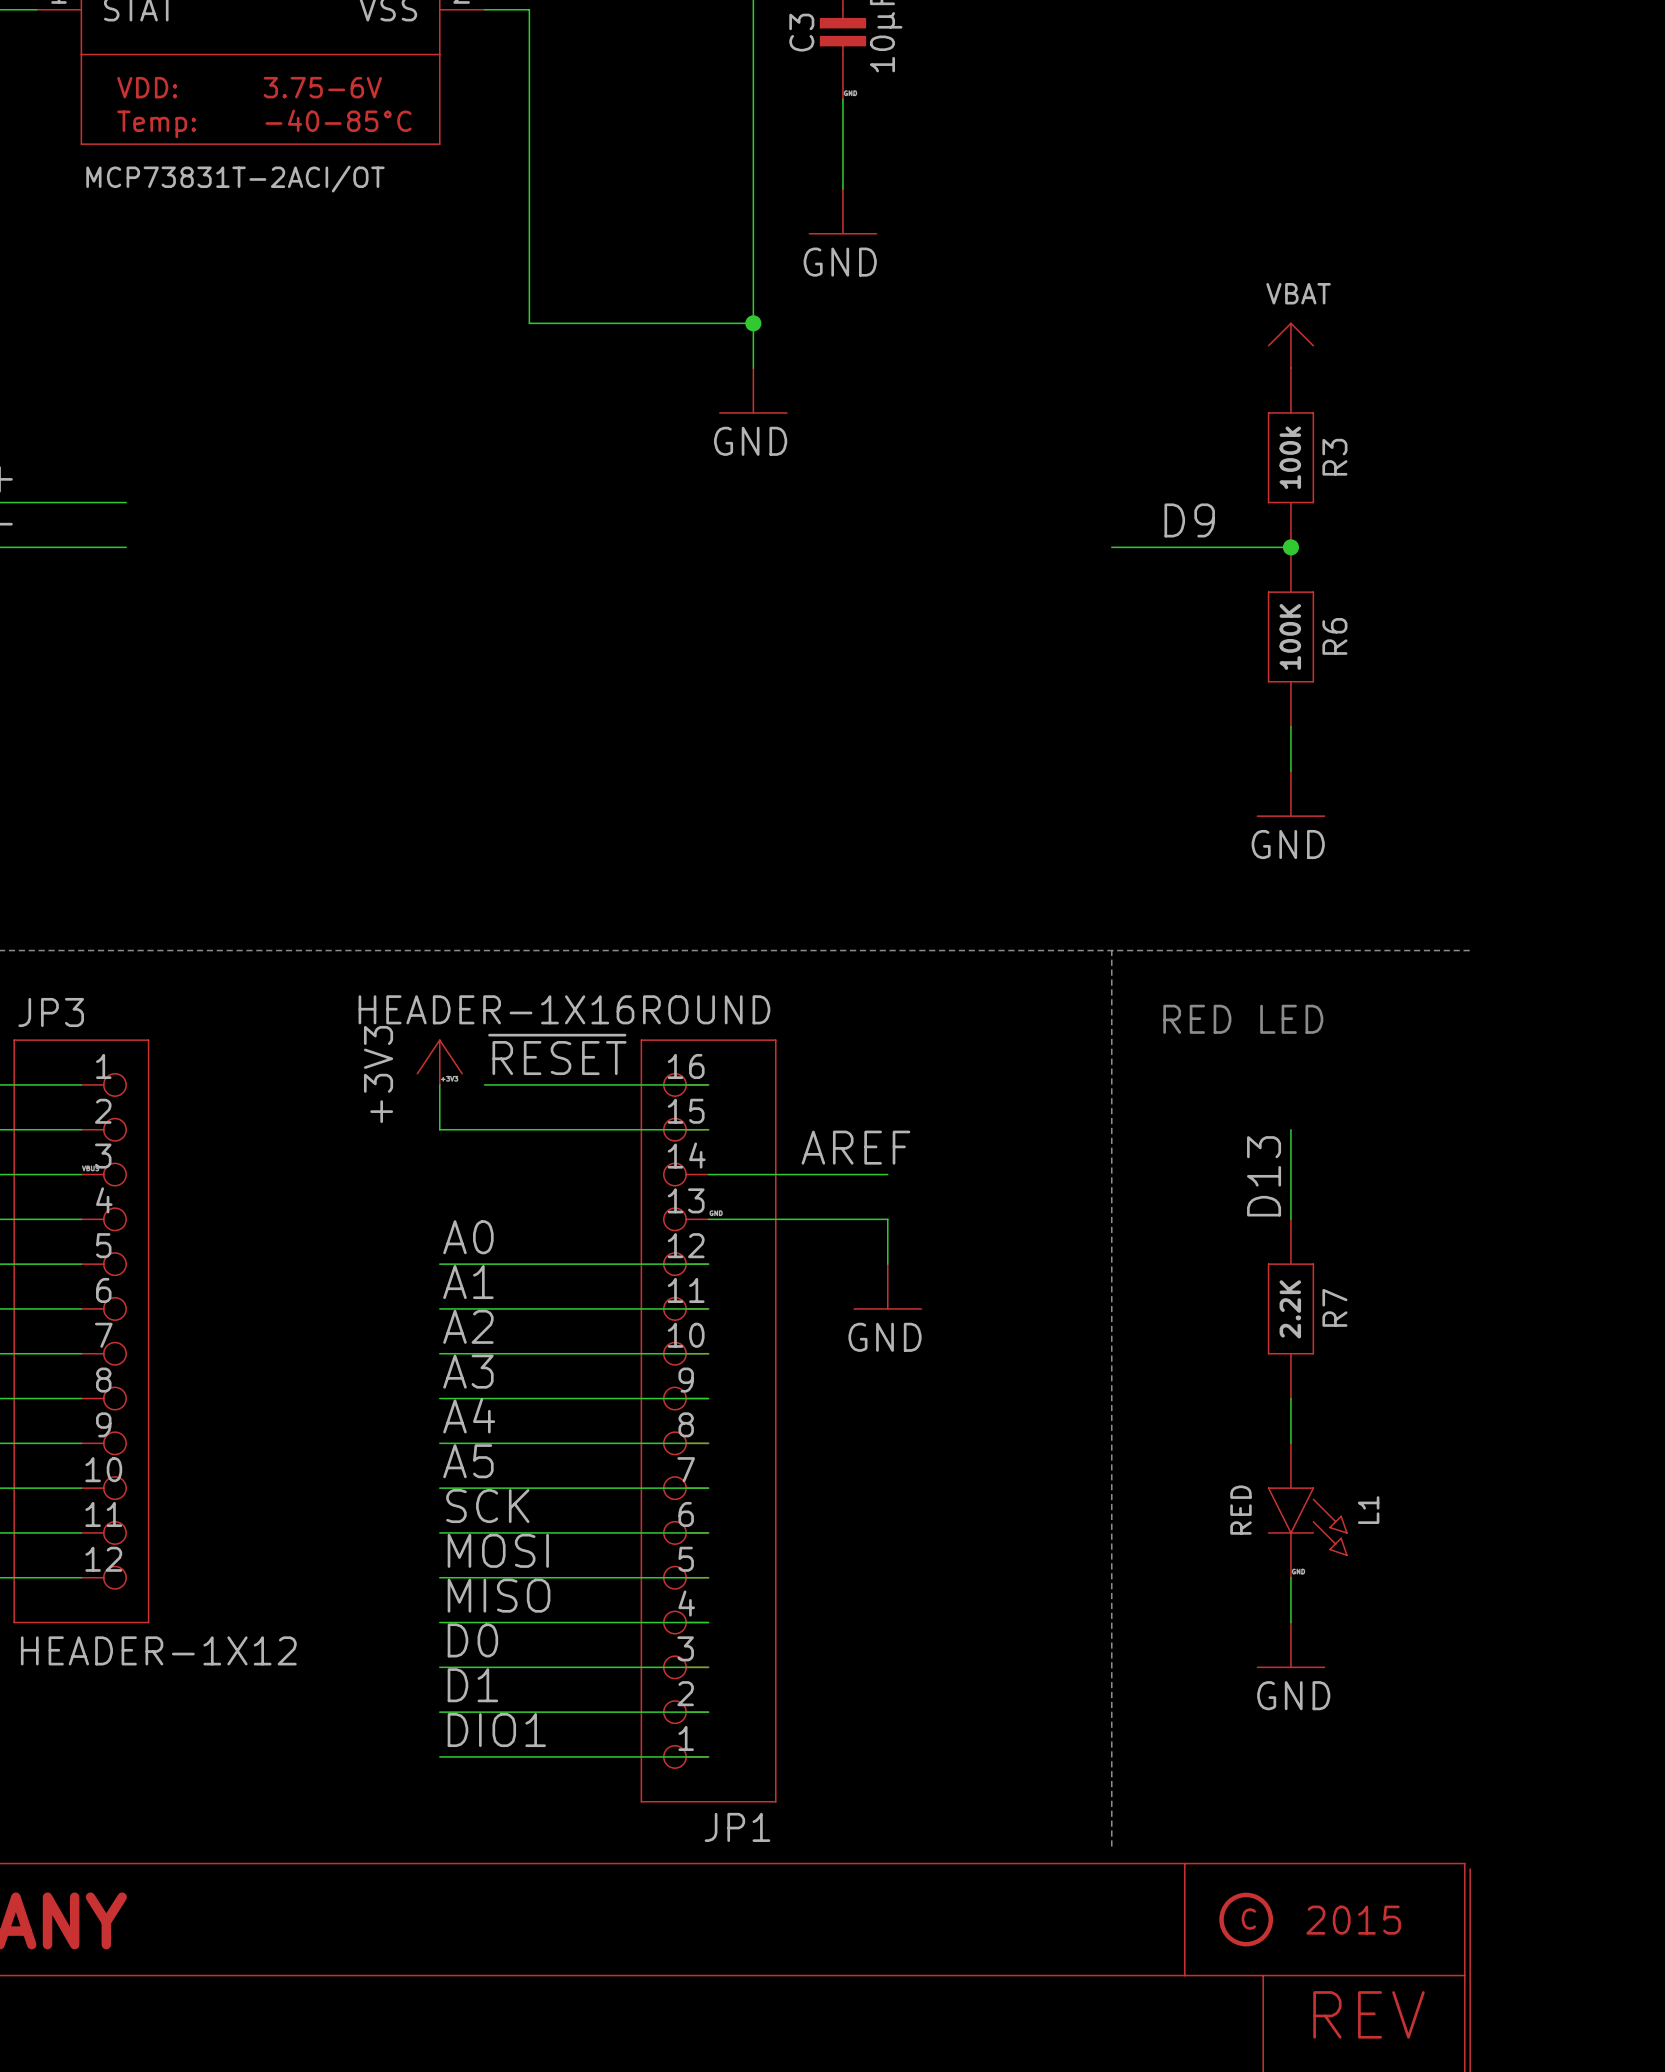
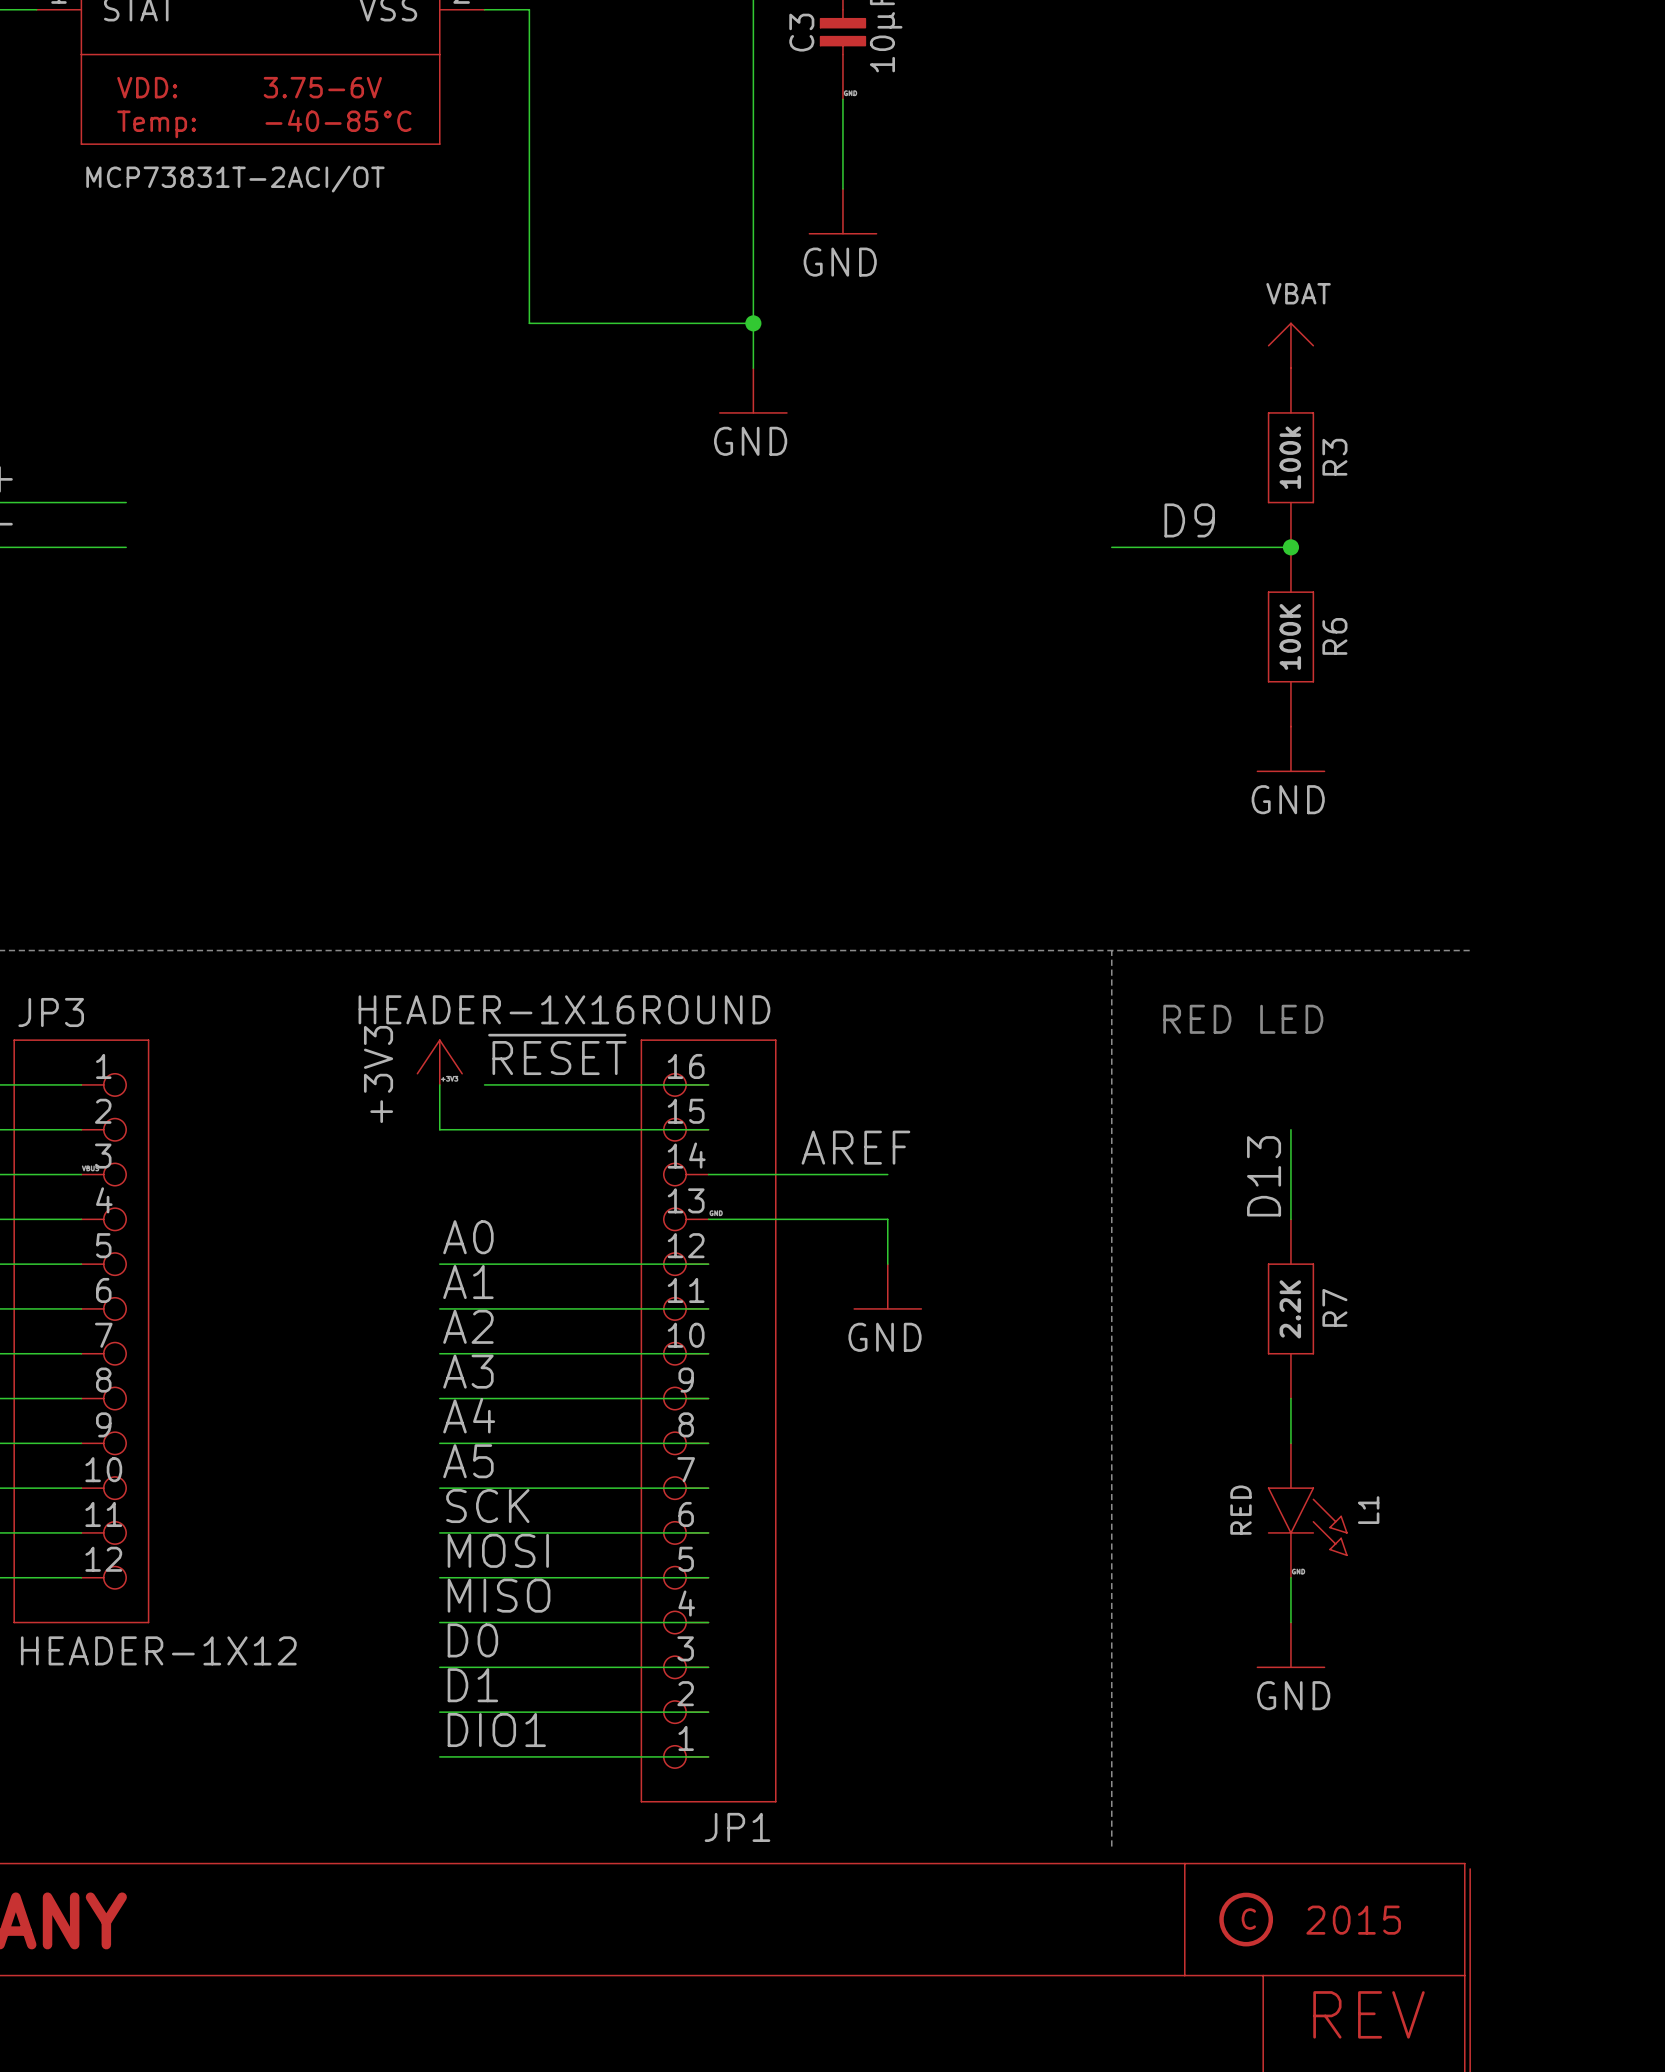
power symbol position: GND (1290, 793) -> GND (1290, 748)

